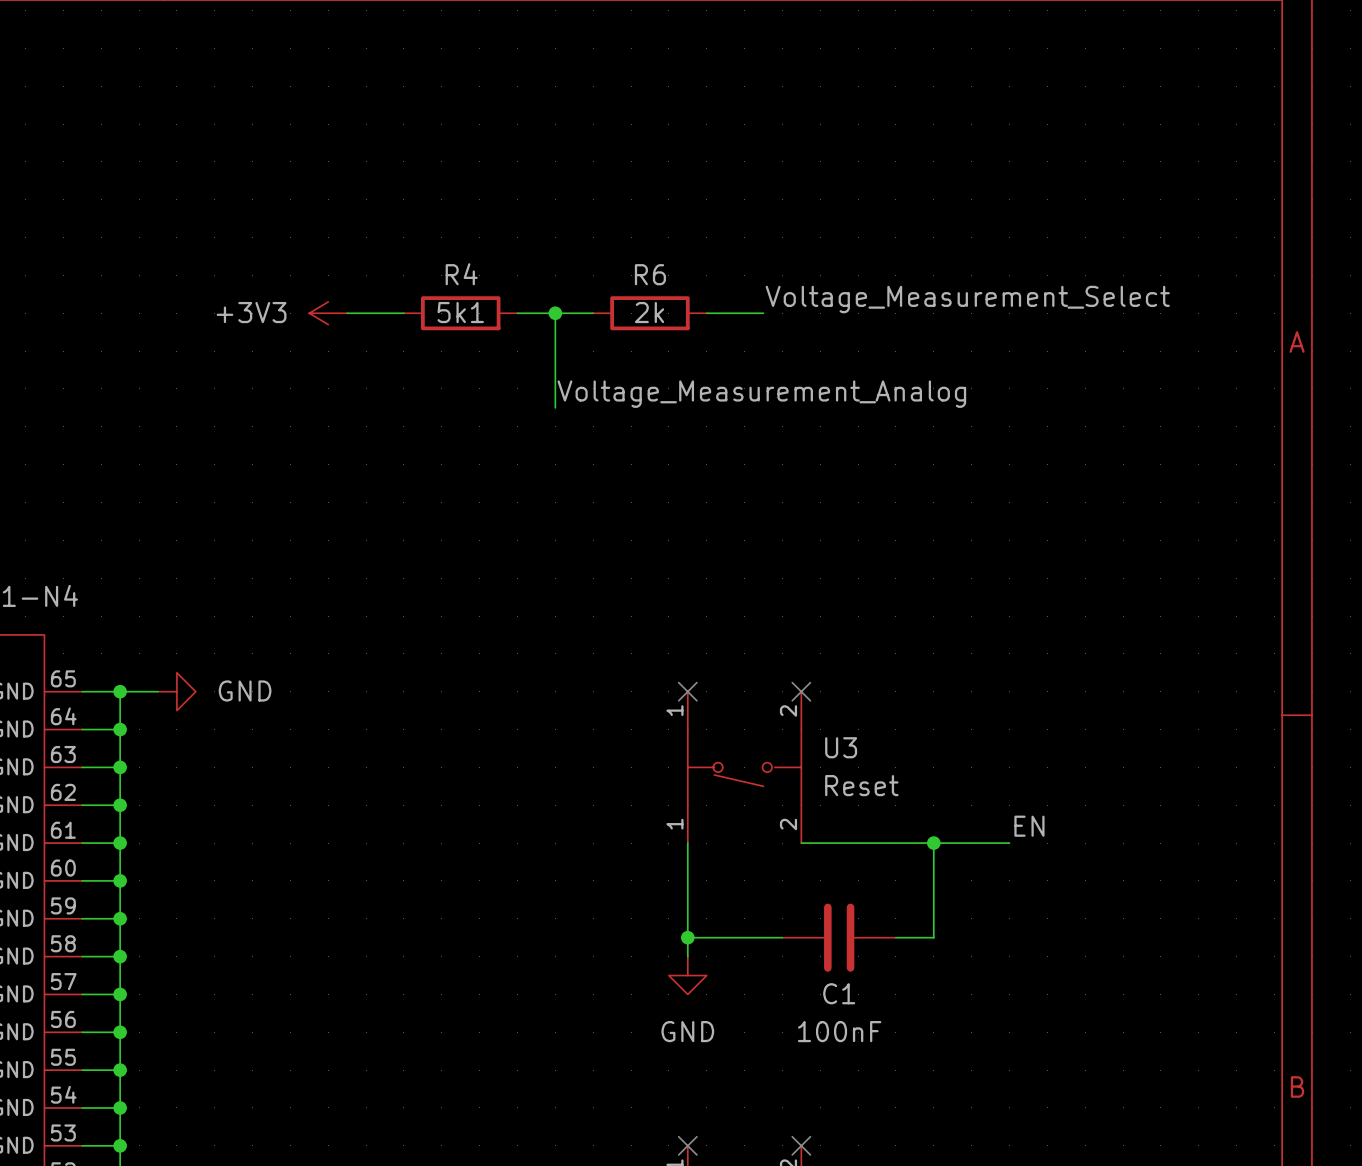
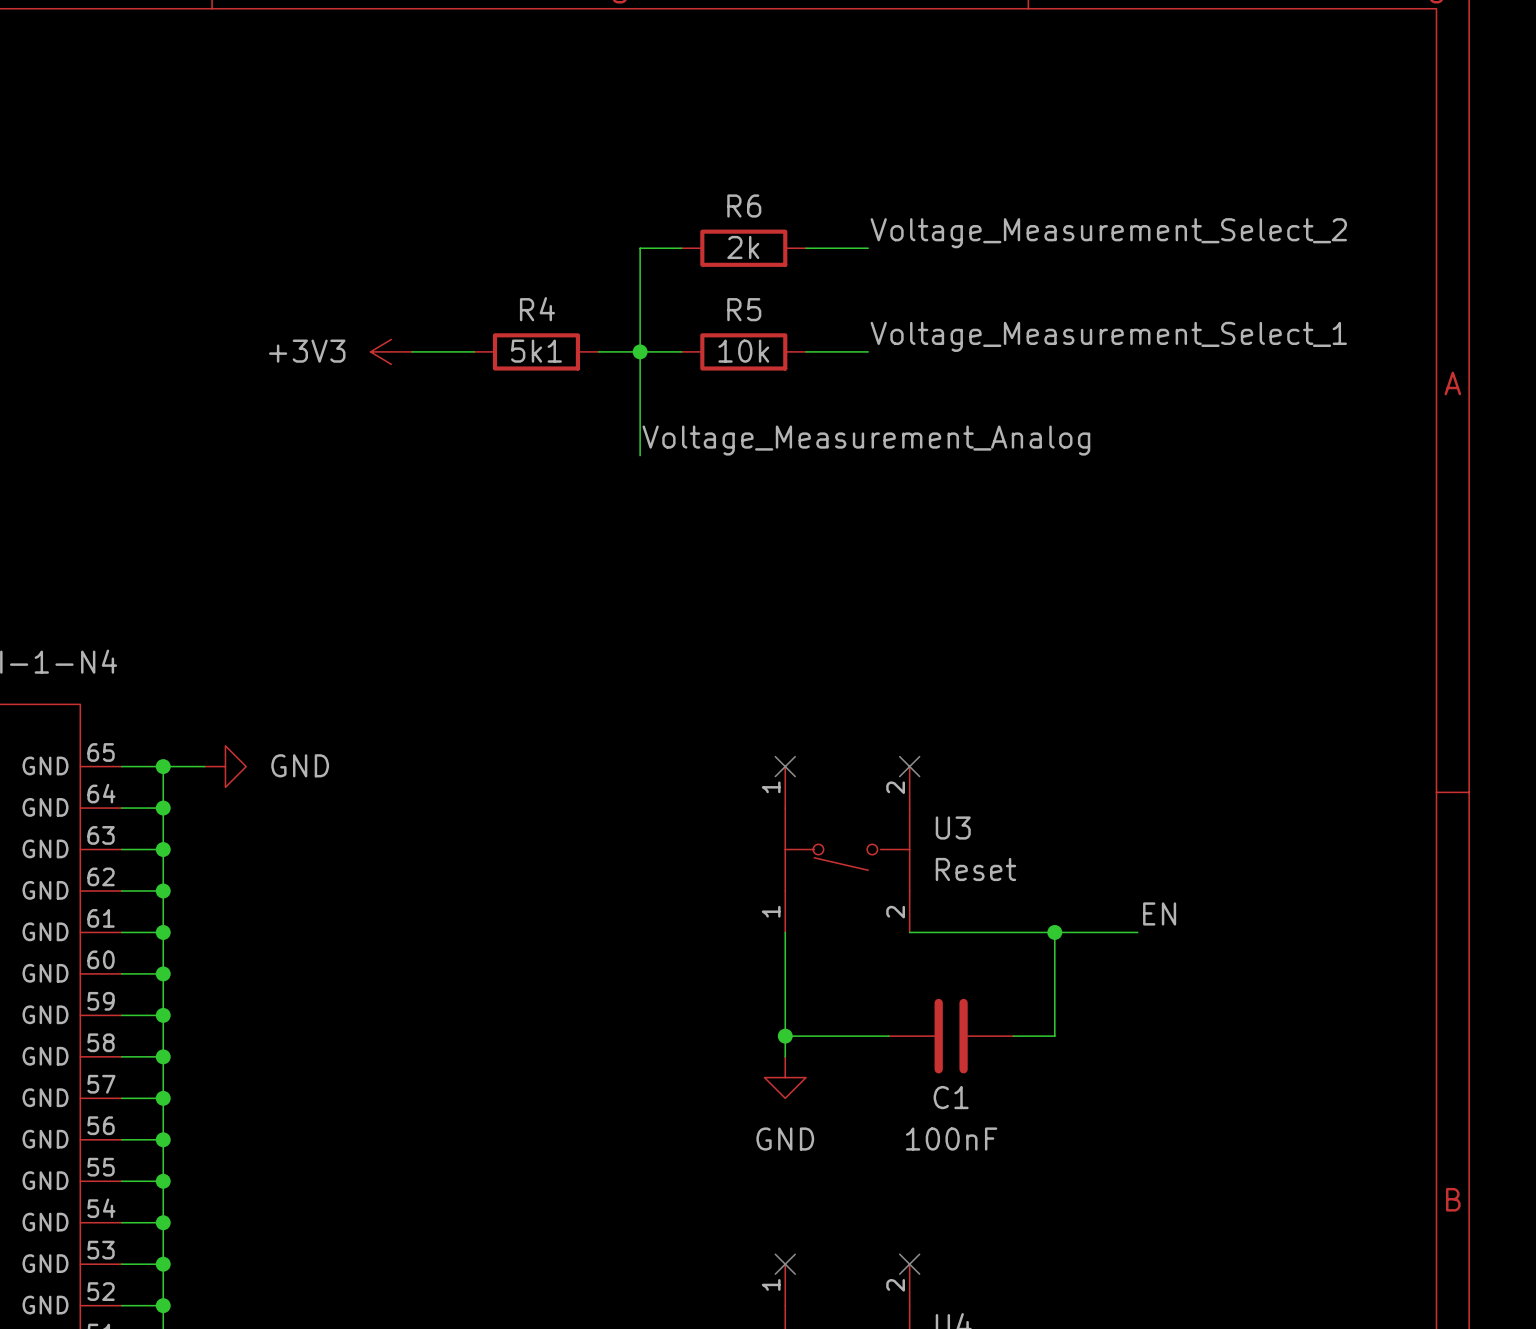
label: none -> Voltage_Measurement_Select_2 (1108, 233)
wire: none -> (681, 248) (640, 248) (640, 351)
R6: none -> 2k (743, 248)
wire: none -> (805, 248) (868, 248)
R6 name: R6 (650, 274) -> R5 (744, 309)
label: Voltage_Measurement_Select (967, 299) -> Voltage_Measurement_Select_1 (1108, 336)
R6 value: 2k (649, 312) -> 10k (743, 351)

